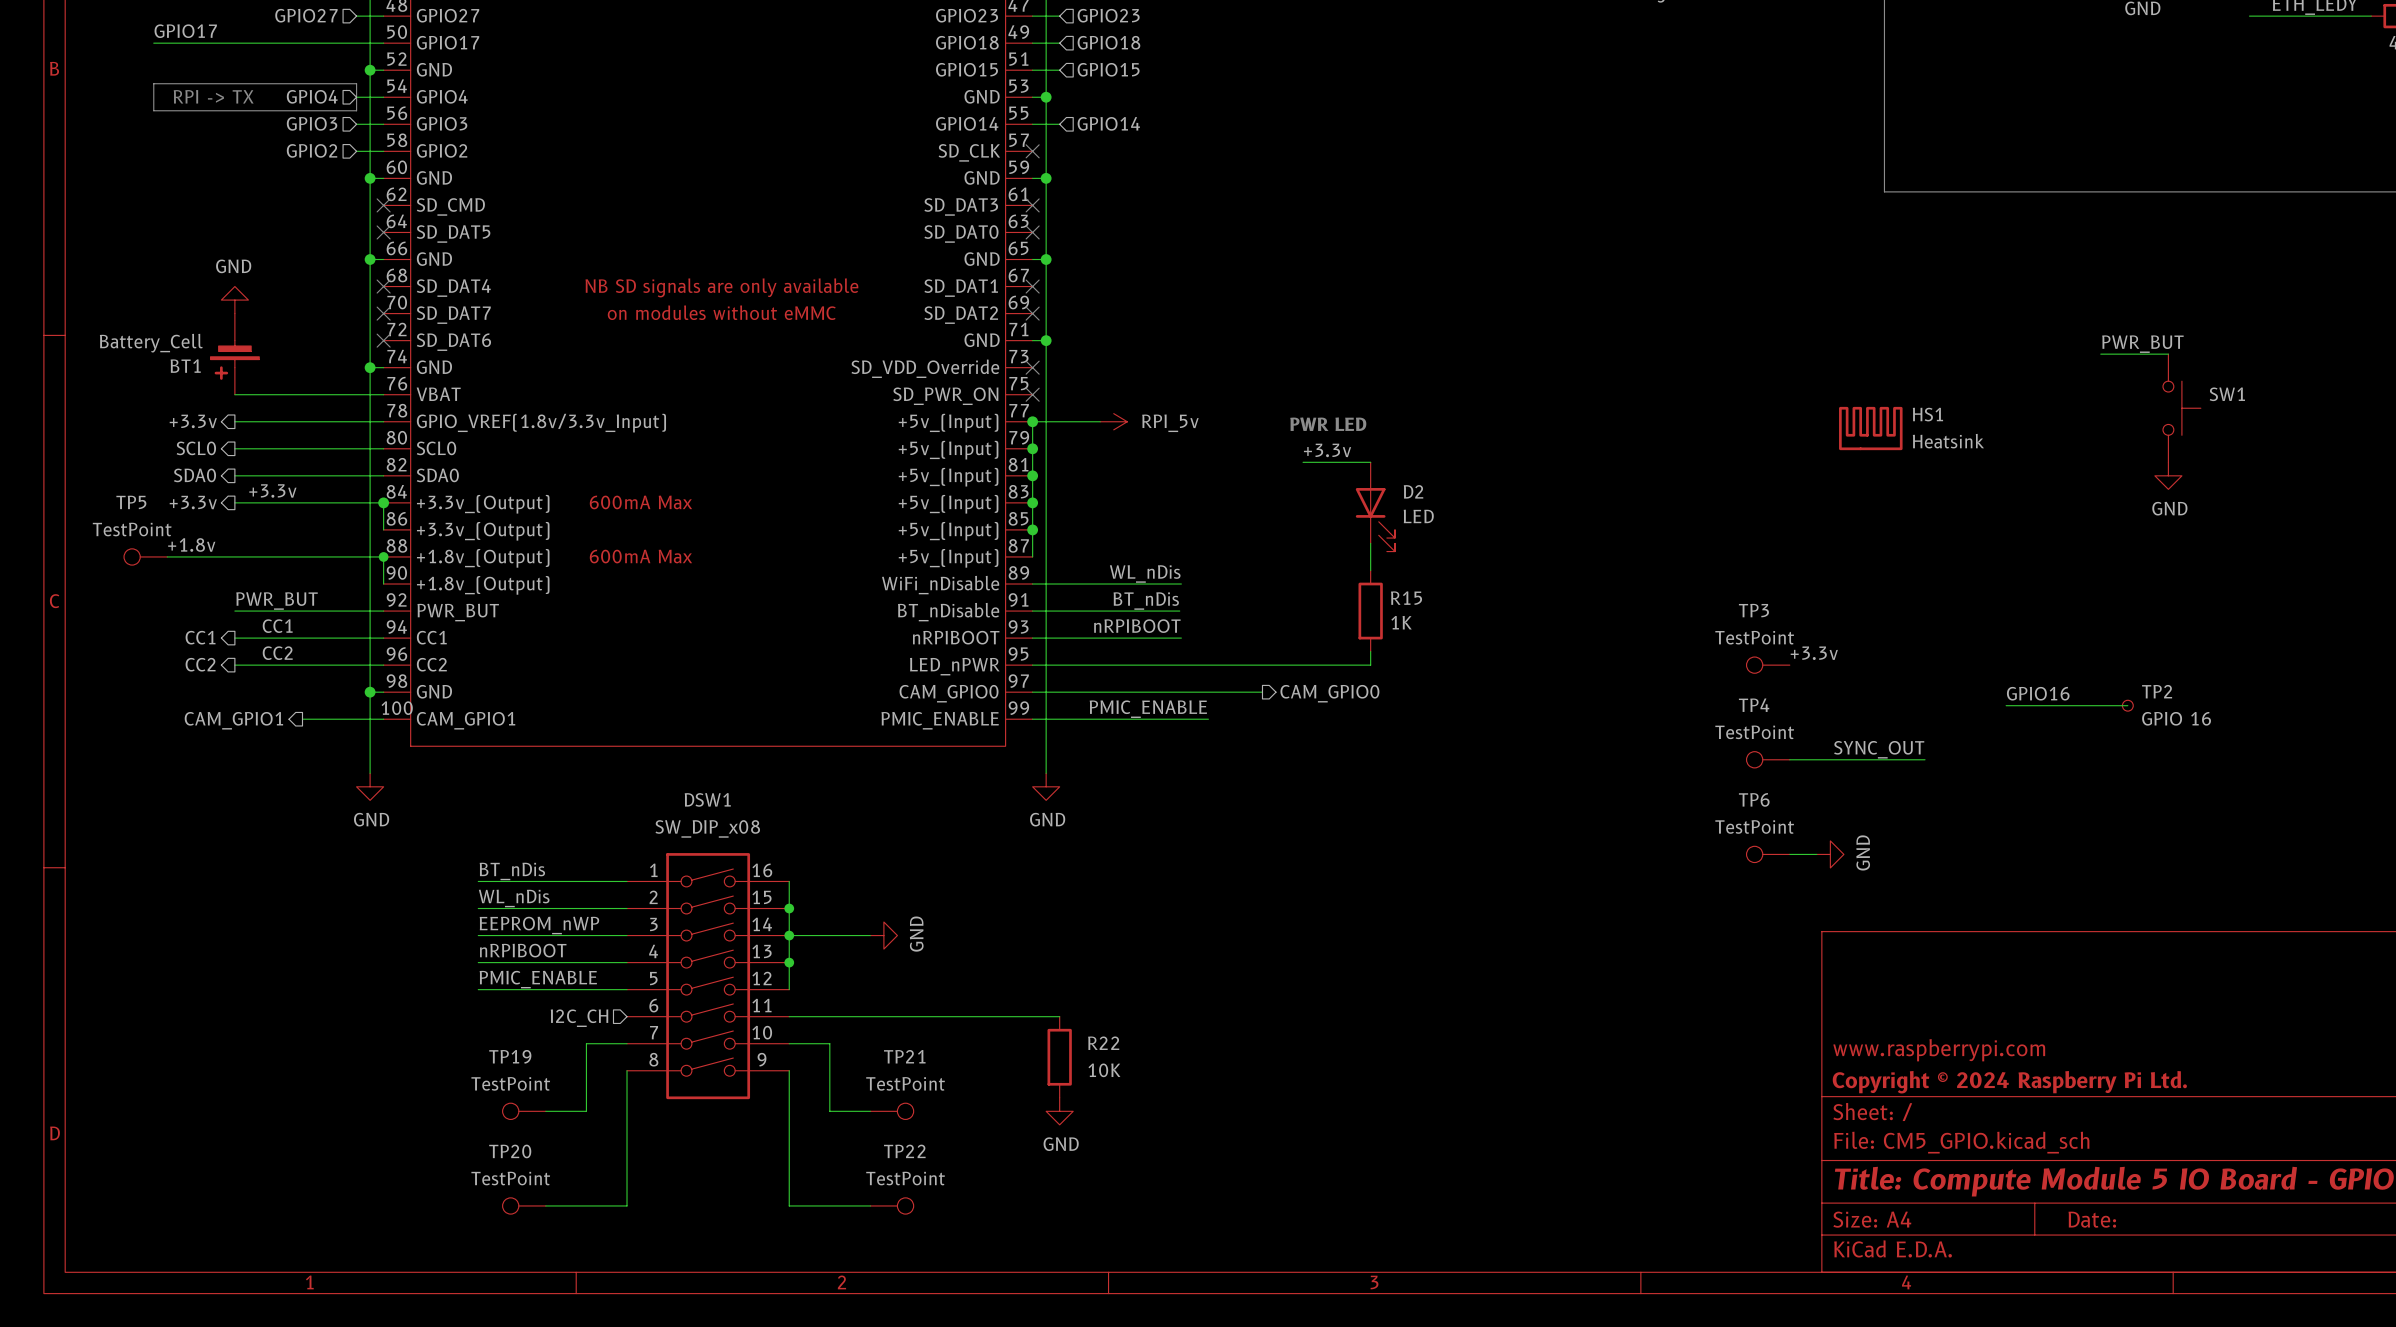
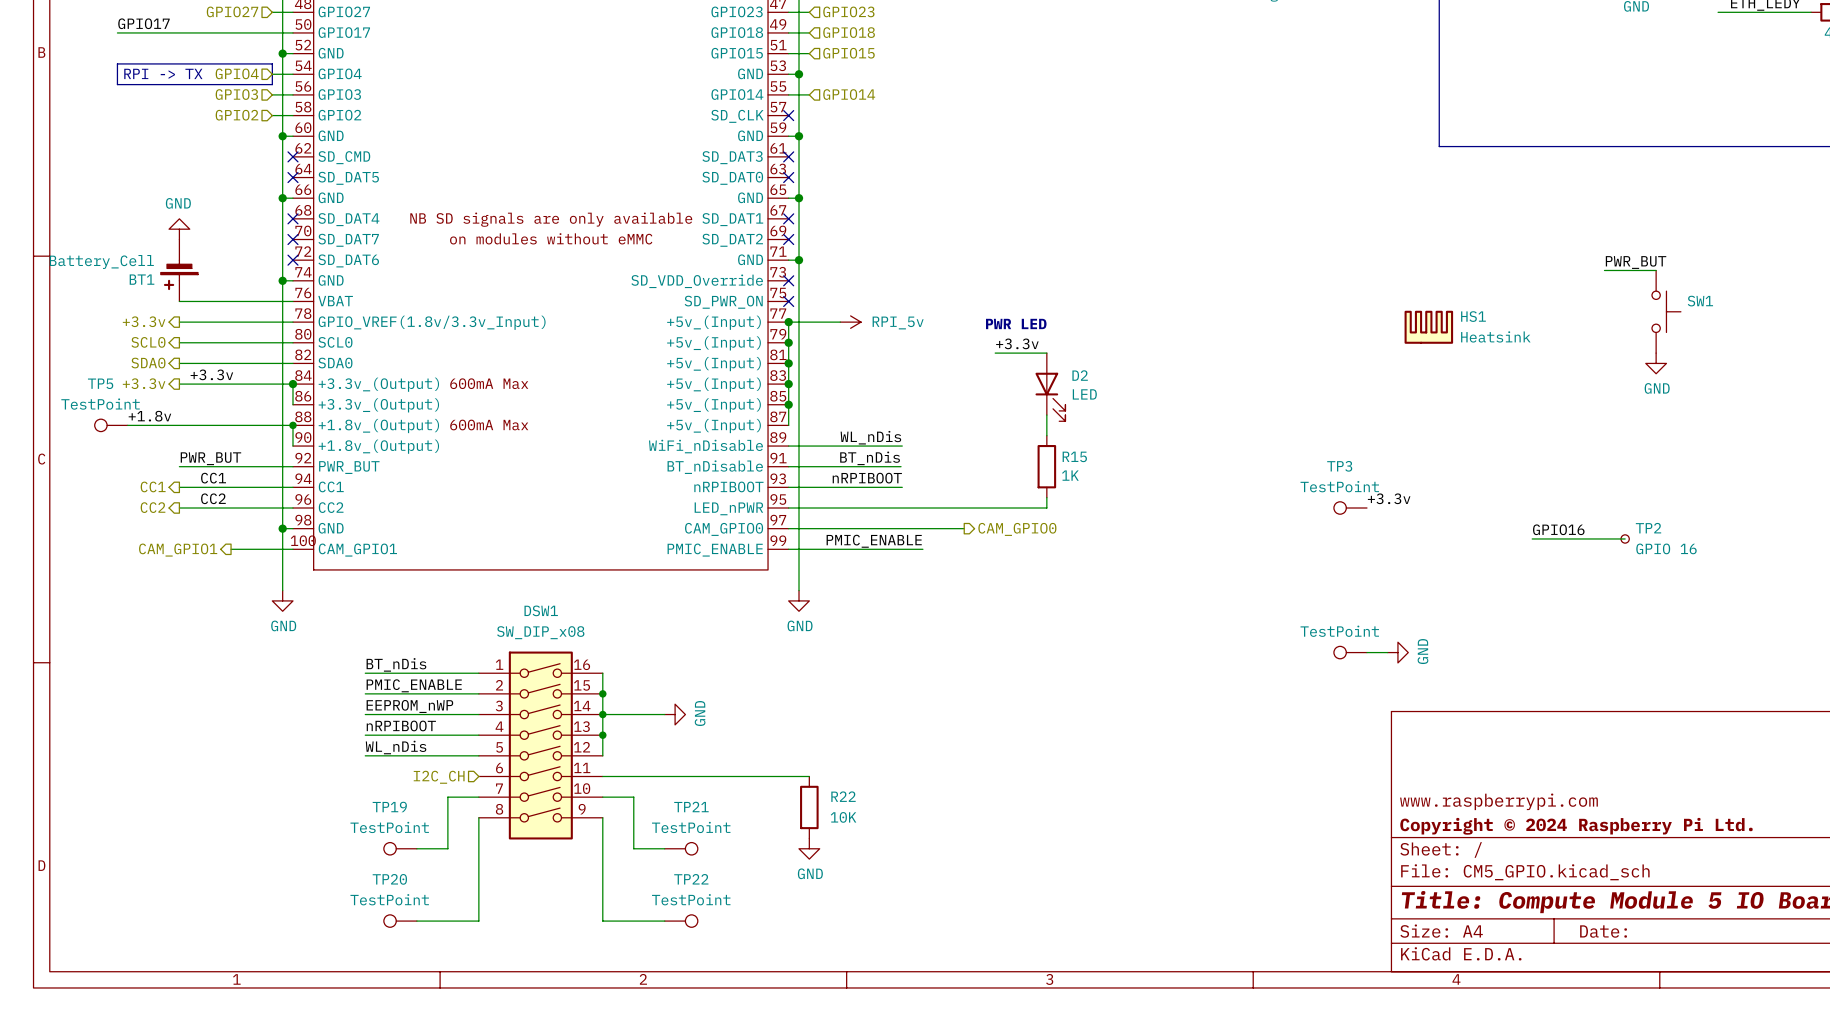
label: SYNC_OUT (1879, 749) -> none
TP4: TestPoint (1768, 759) -> none
wire: (1789, 759) (1925, 759) -> none
TP6 name: TP6 (1754, 799) -> none
label: WL_nDis (514, 898) -> PMIC_ENABLE (414, 685)
label: PMIC_ENABLE (538, 979) -> WL_nDis (396, 747)

